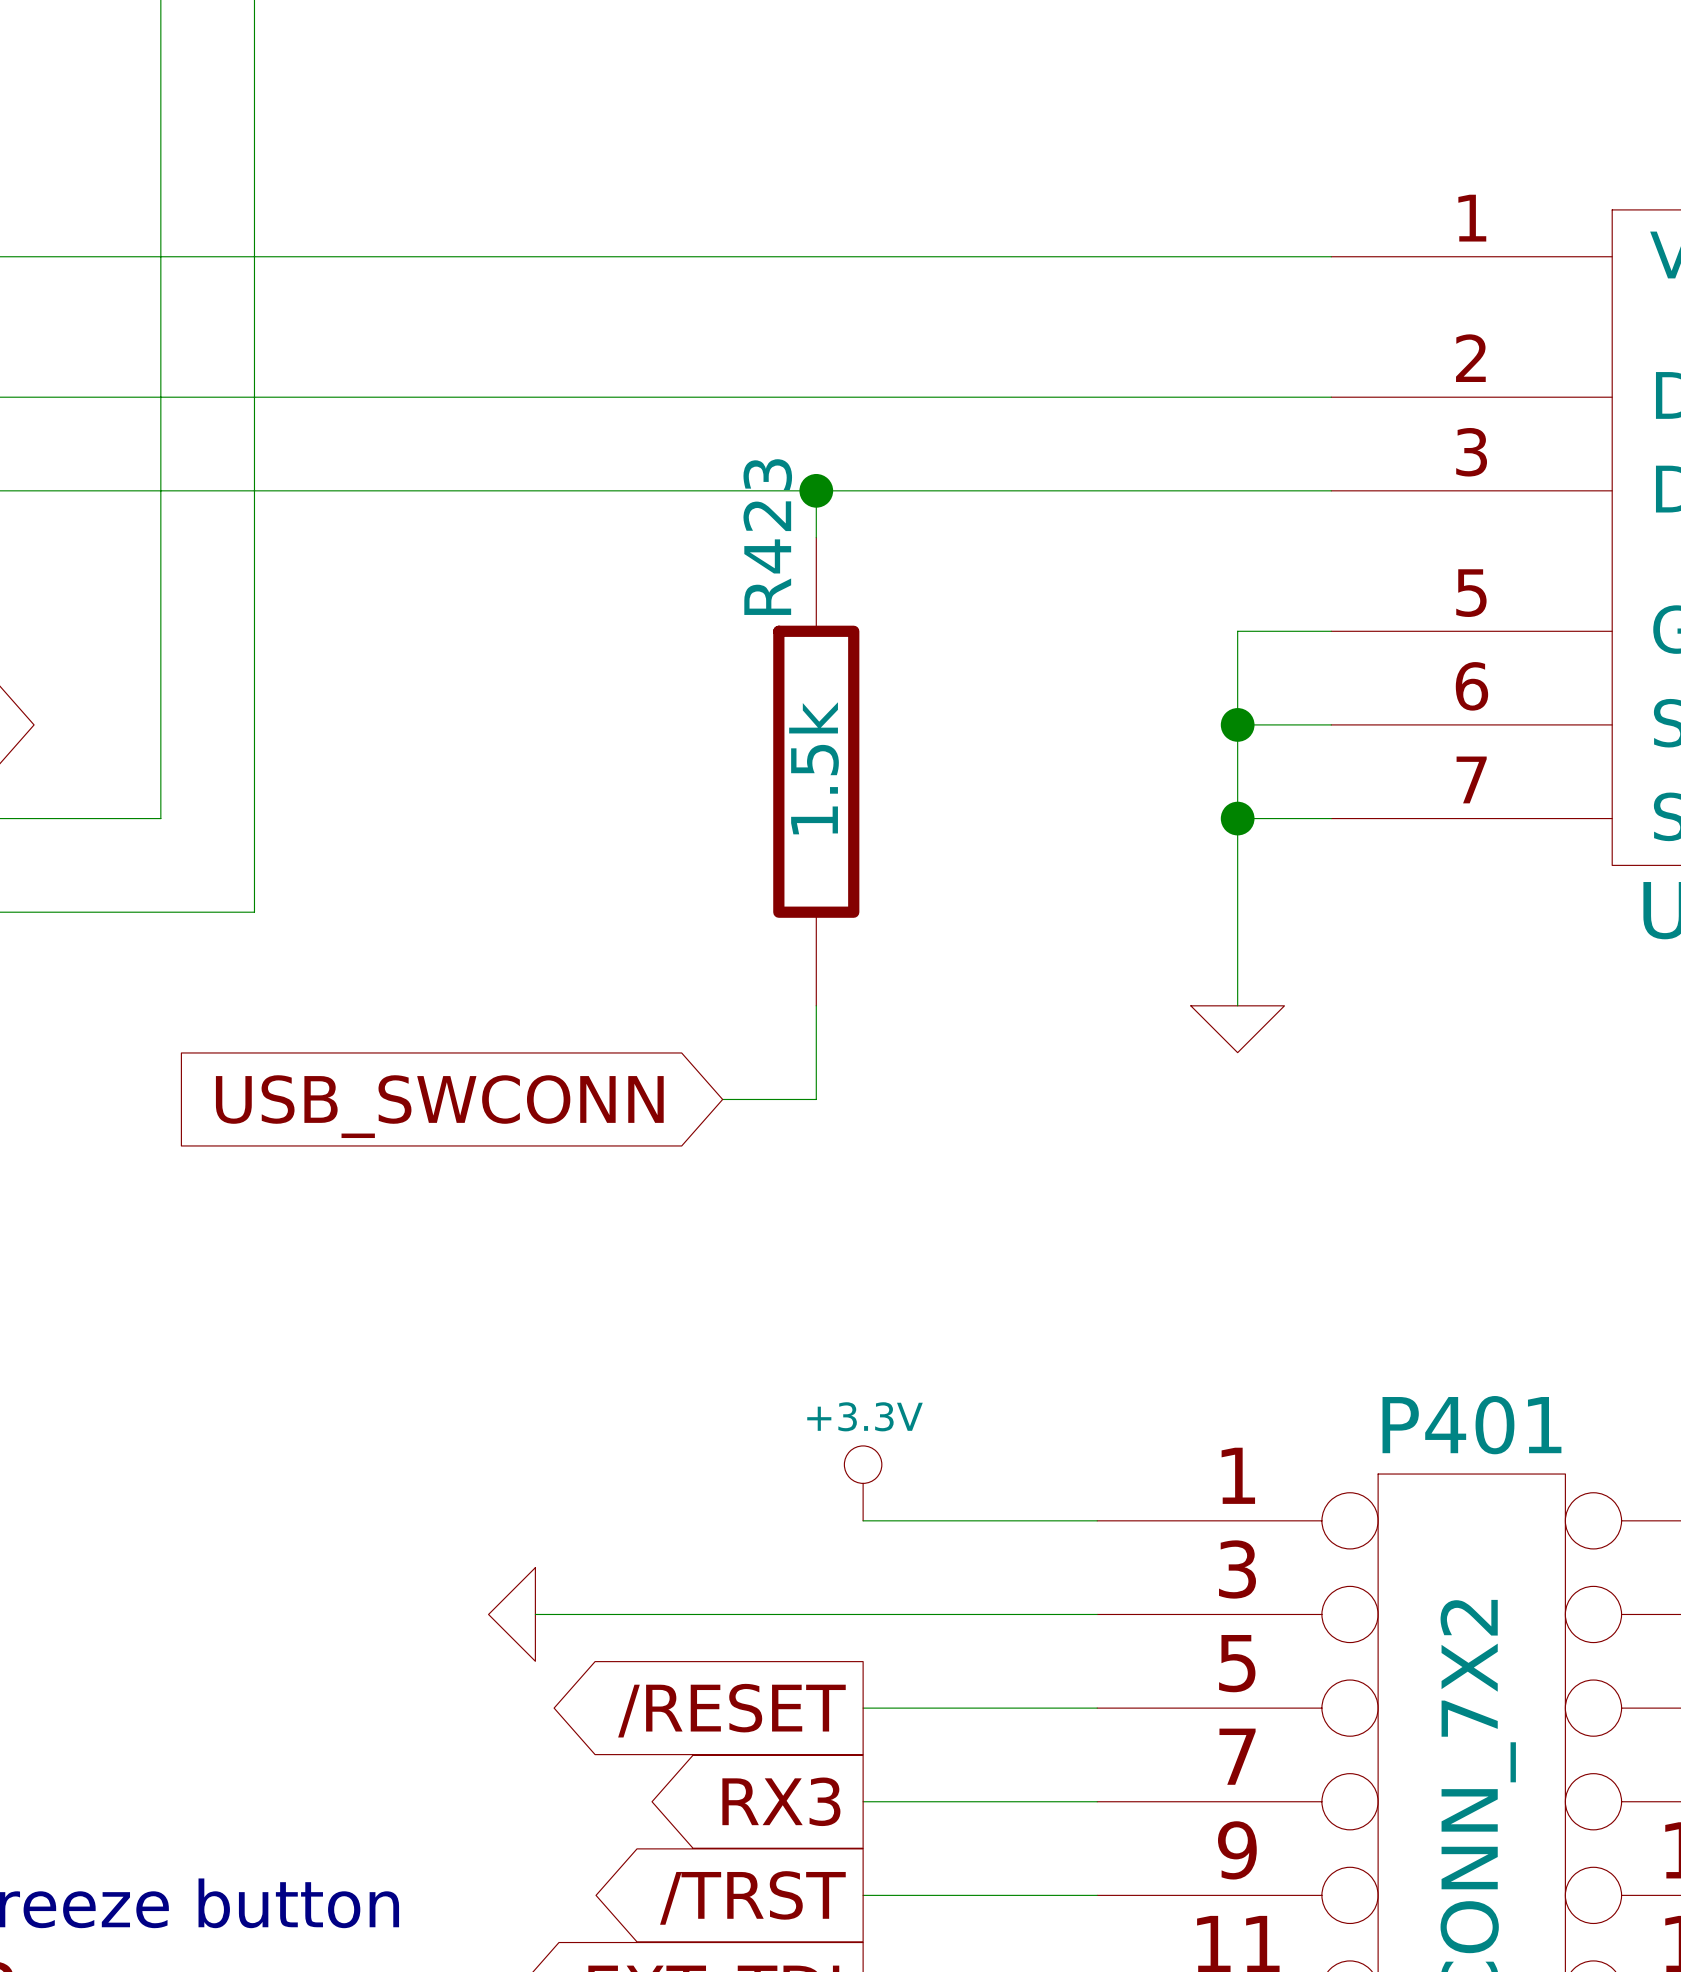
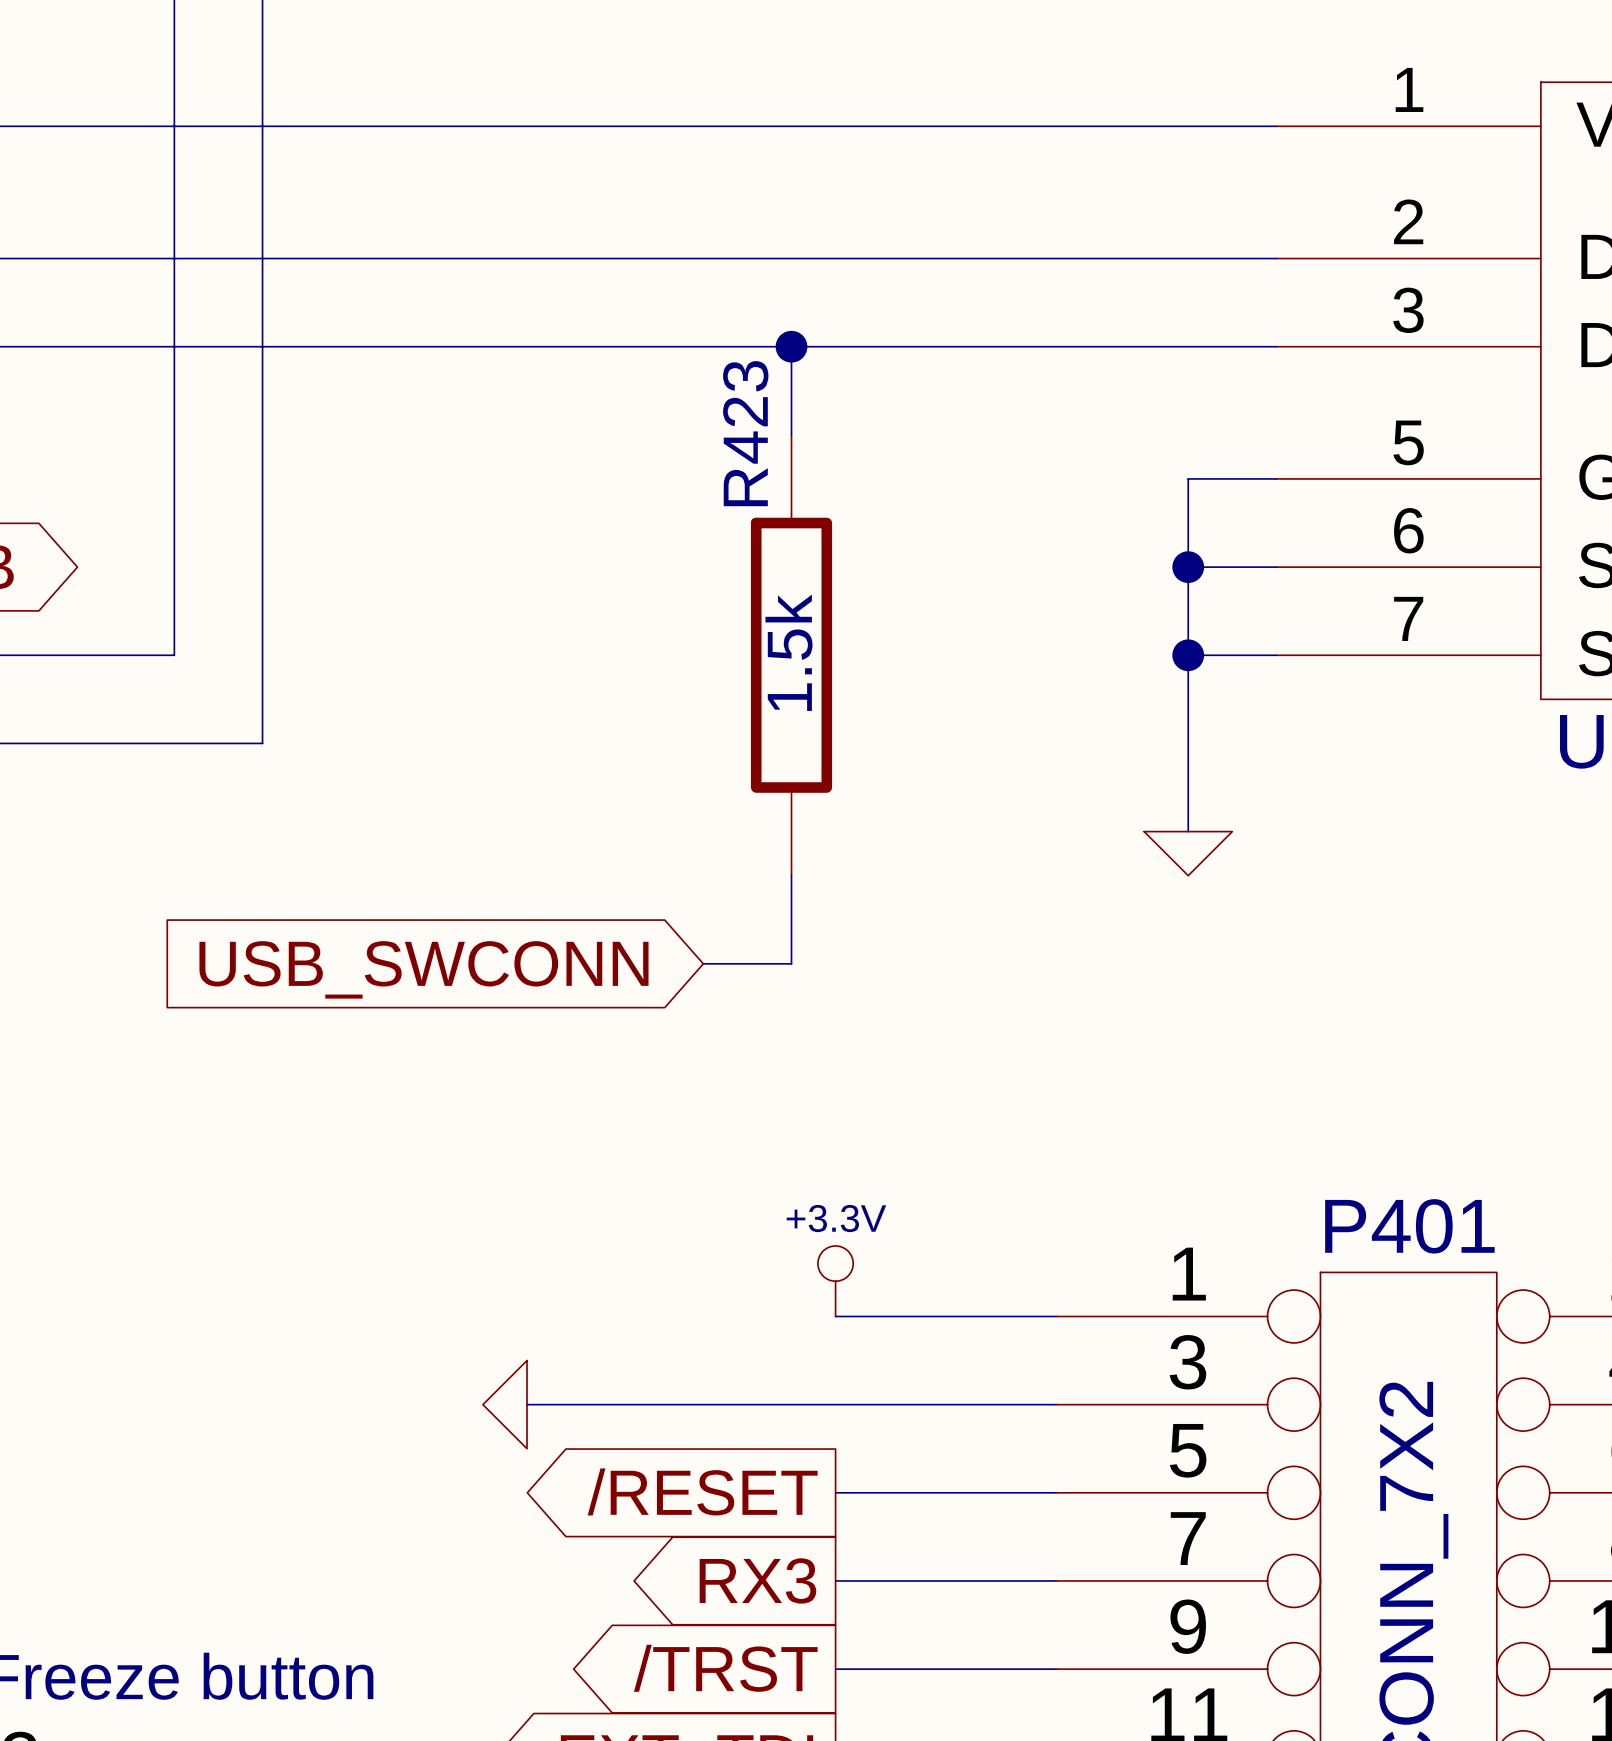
R423 position: (816, 771) -> (791, 655)
wire: (722, 1099) (816, 1099) -> (703, 963) (791, 963) (791, 919)
global label position: USB_SWCONN (439, 1106) -> USB_SWCONN (423, 969)

